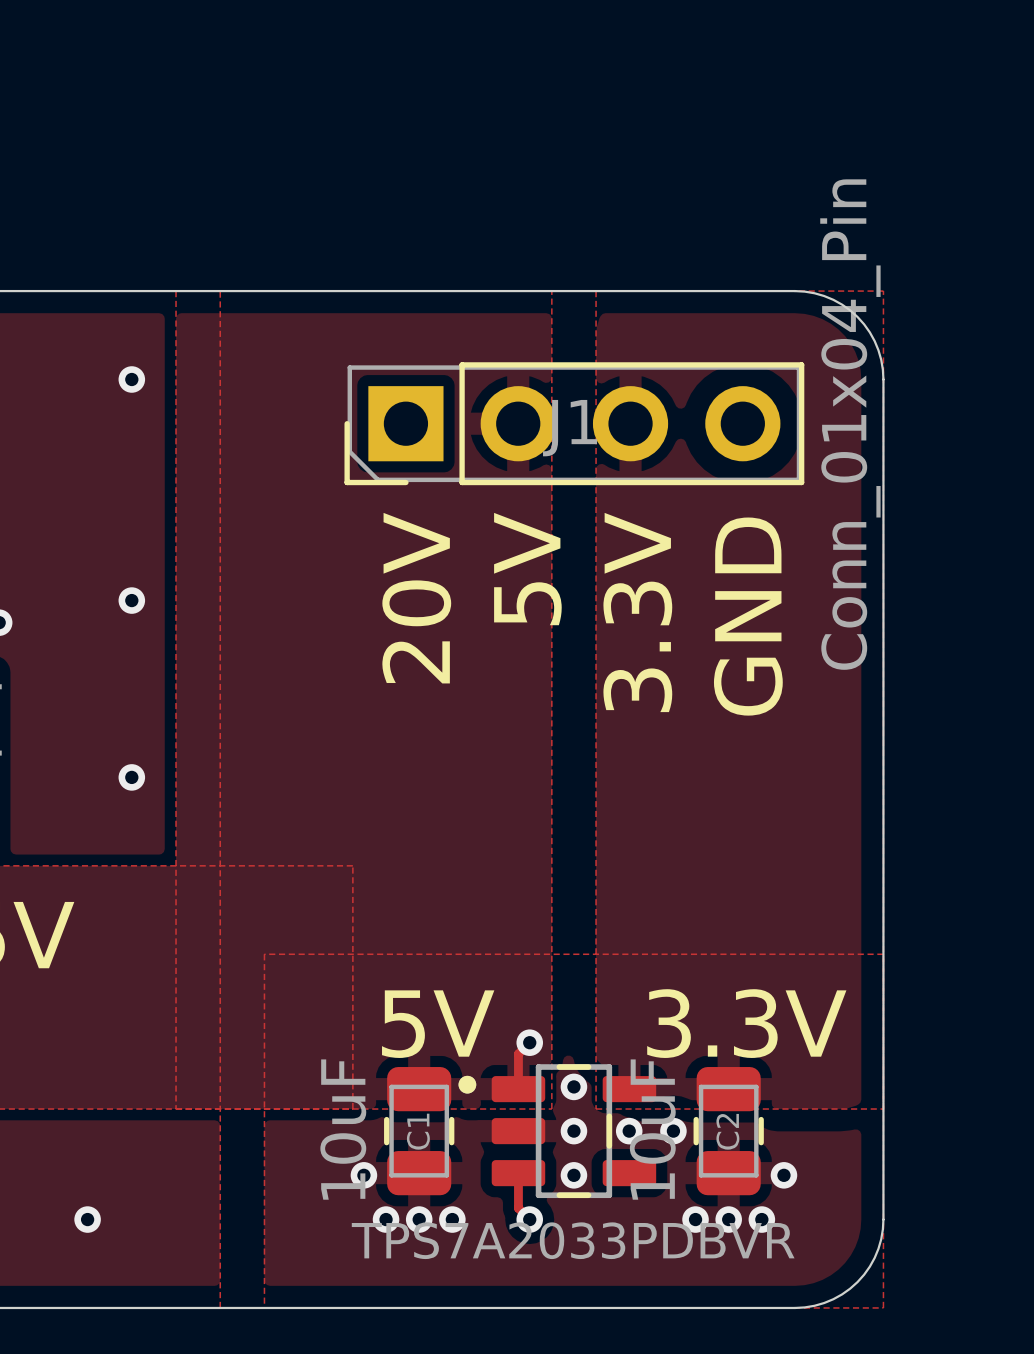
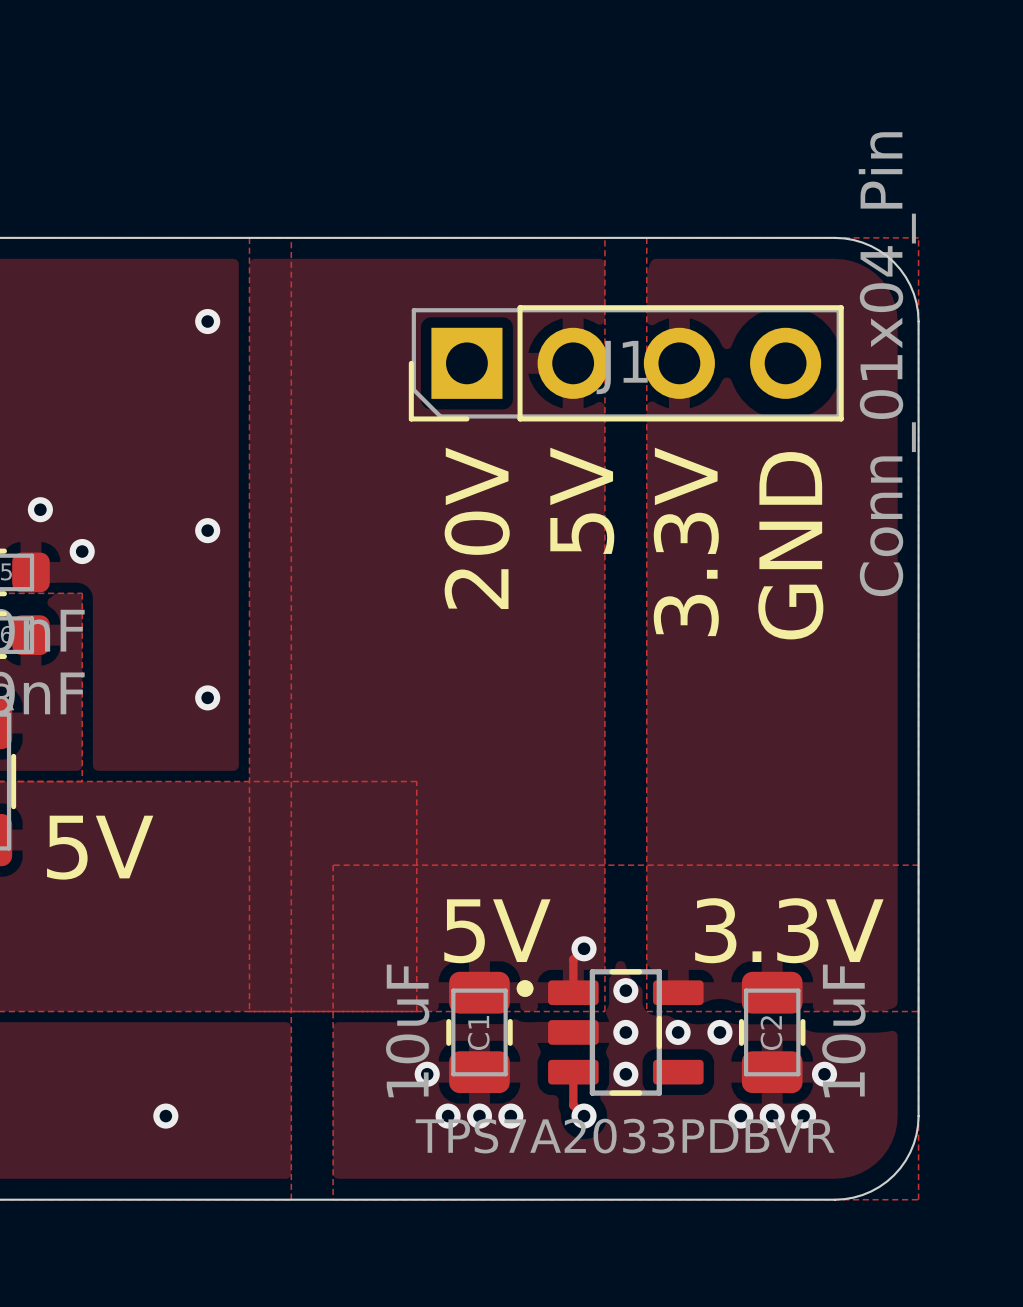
C2 value position: 10uF (652, 1129) -> 10uF (843, 1030)

